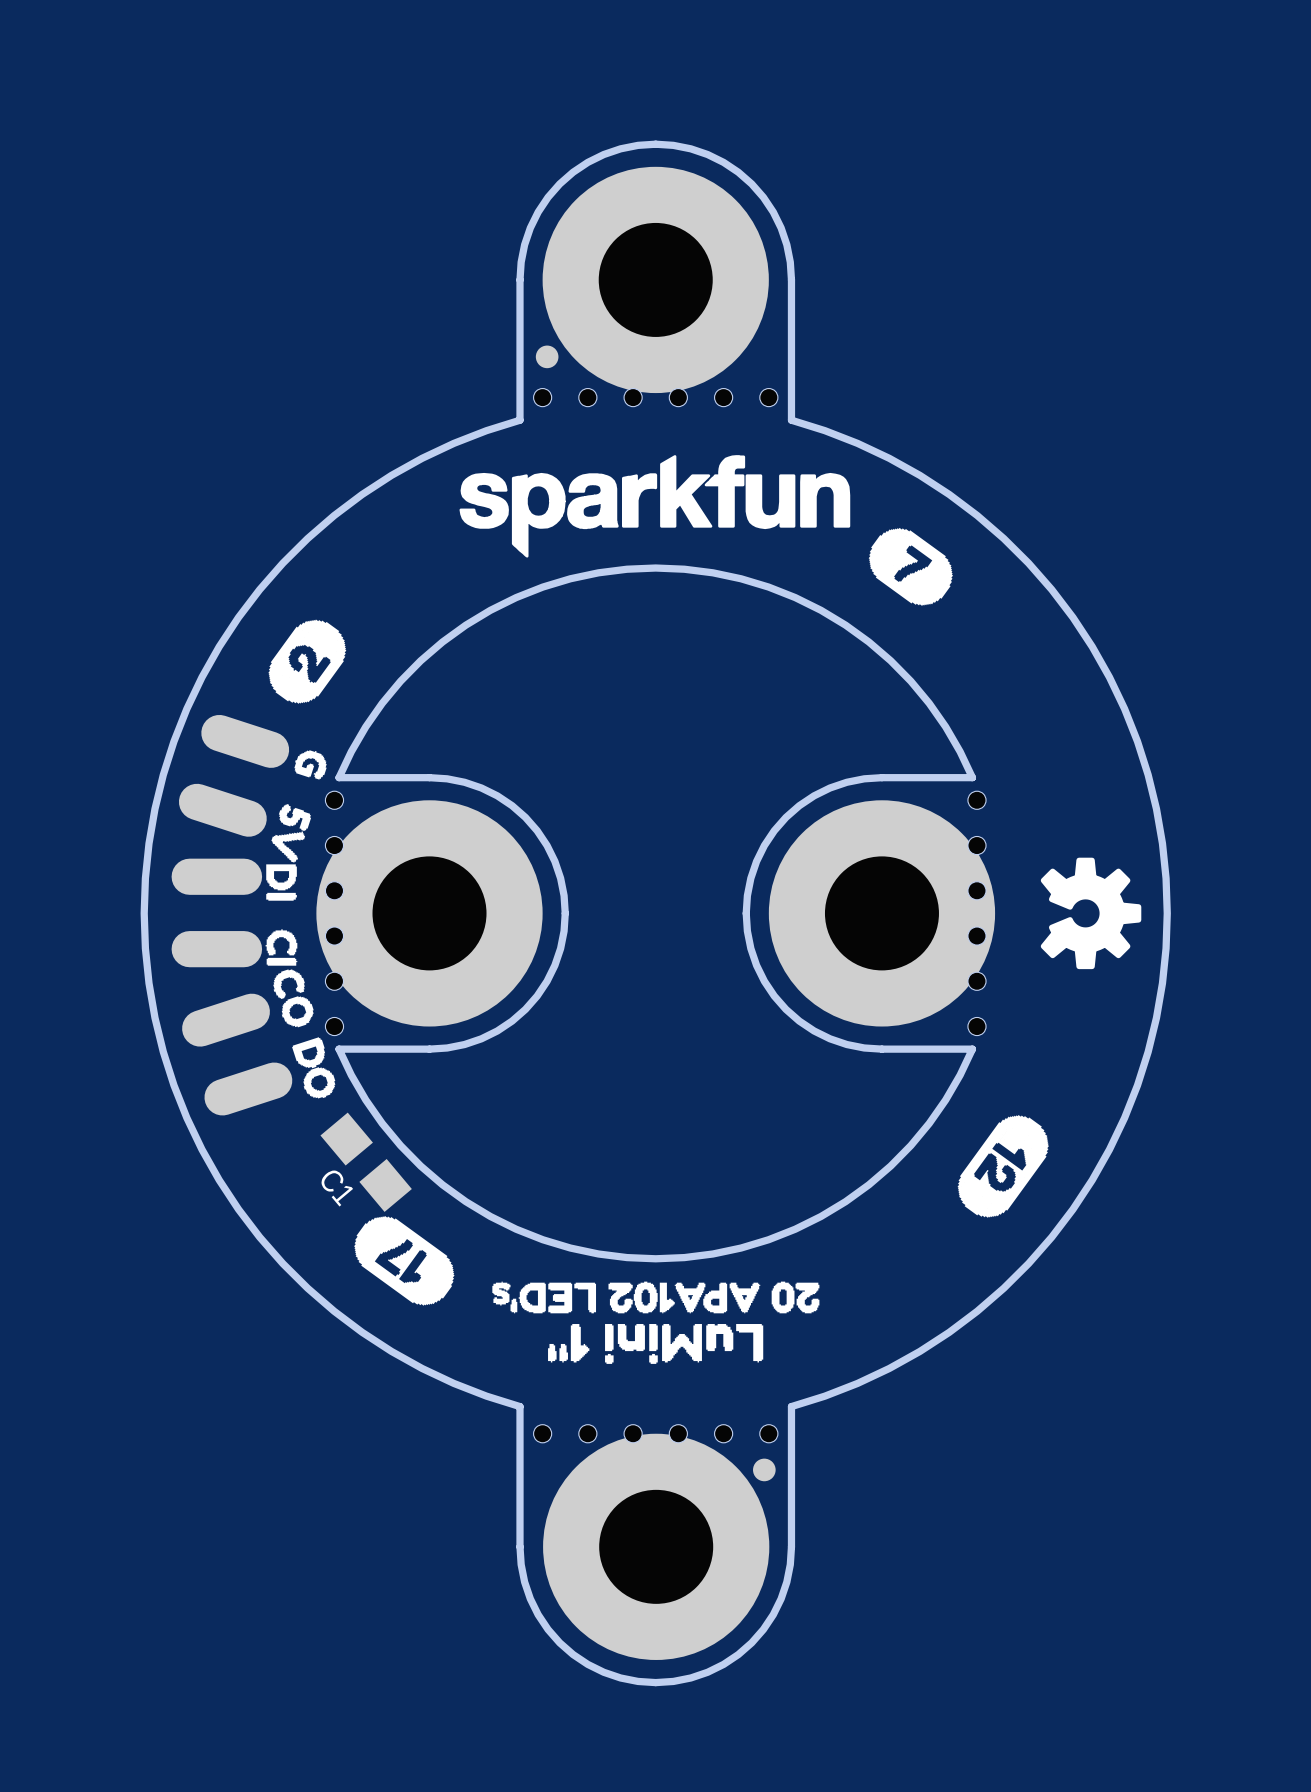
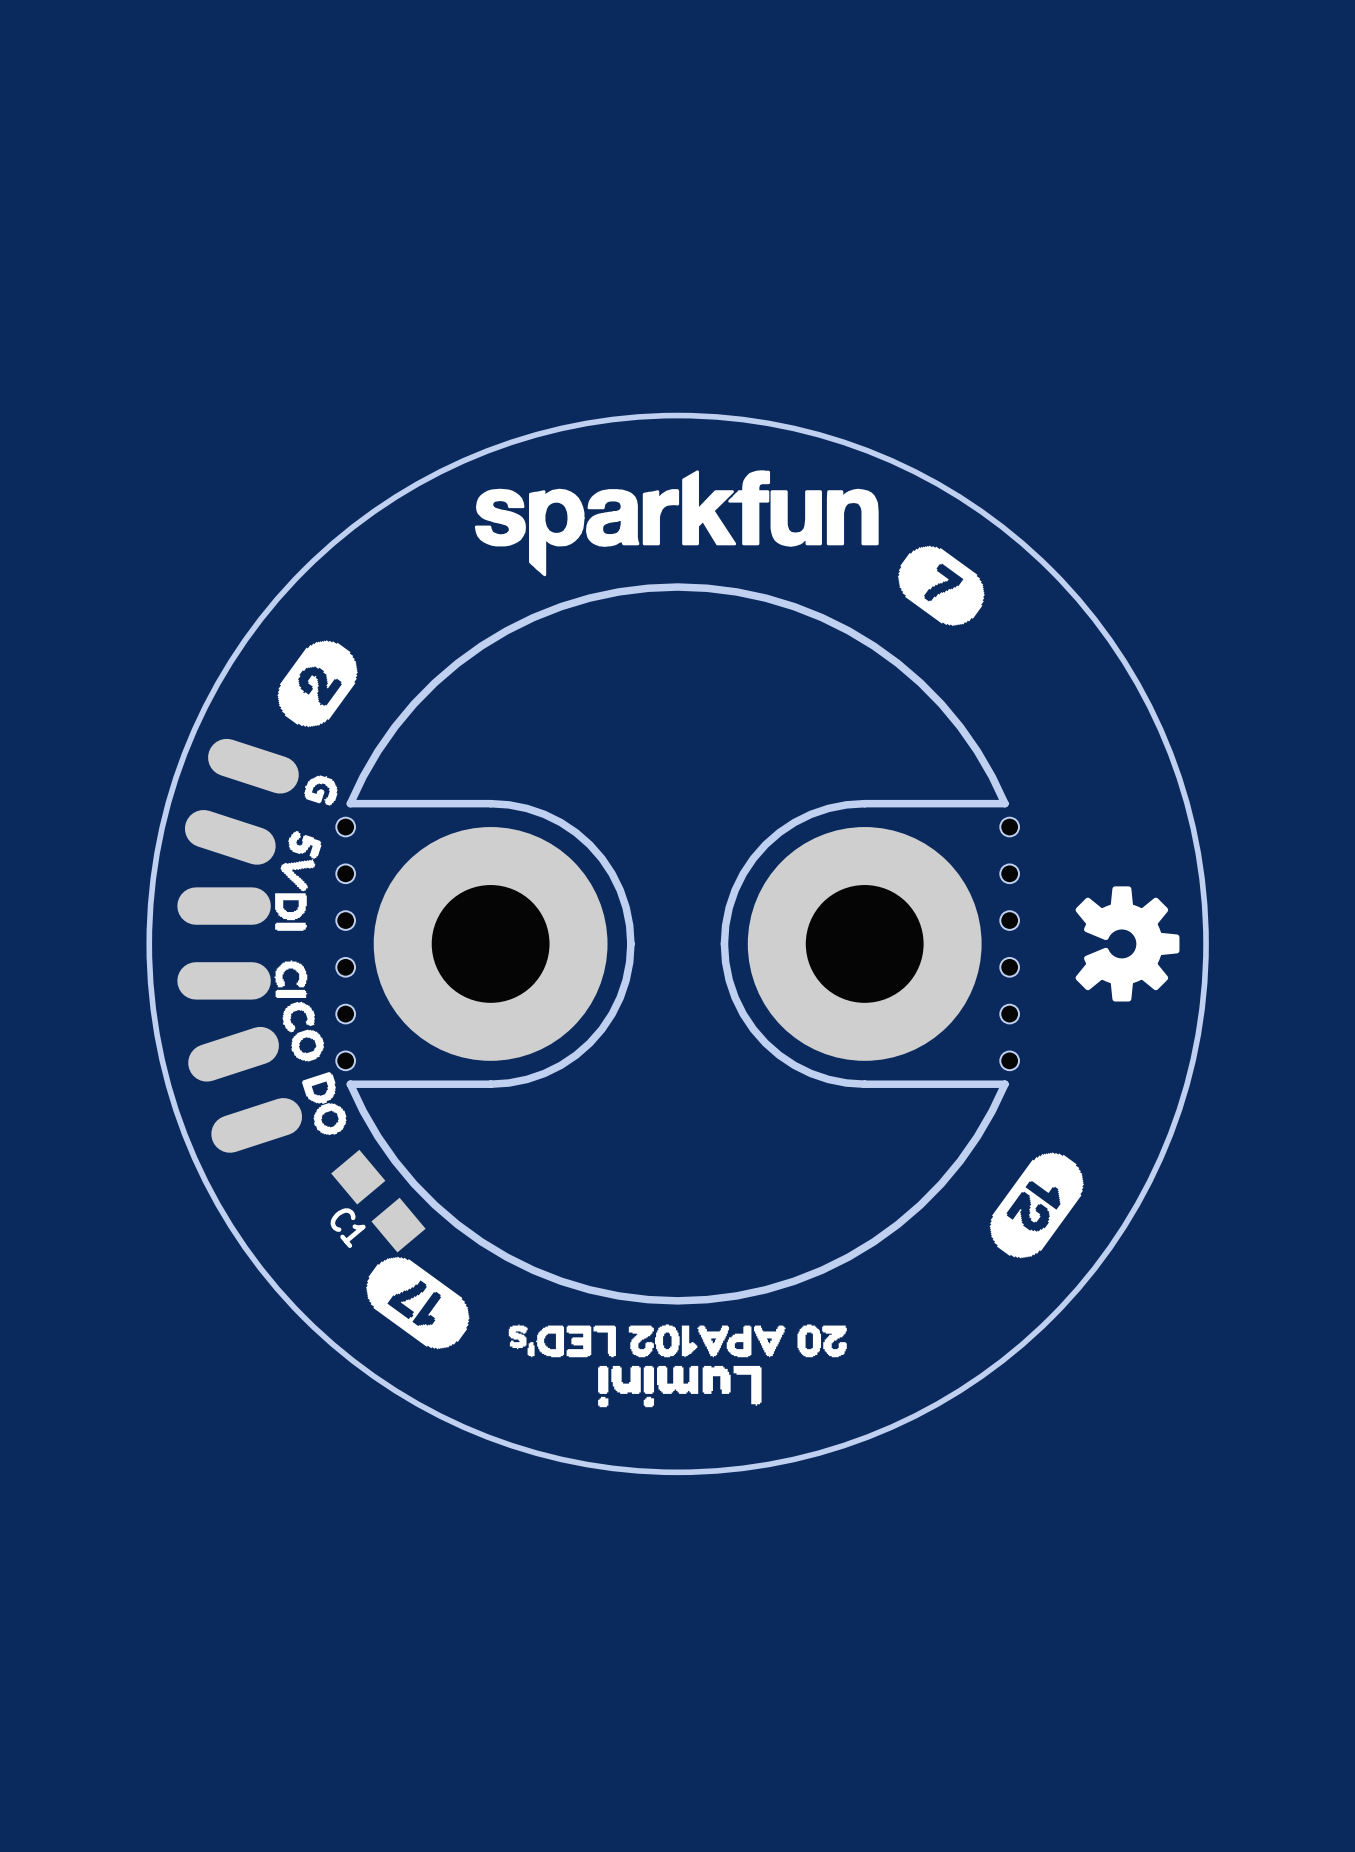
board edge: (655, 144) (620, 148) (587, 162) (559, 183) (548, 197) (530, 228) (524, 244) (519, 279) (519, 420) (453, 443) (391, 475) (362, 494) (307, 538) (259, 589) (238, 617) (219, 646) (186, 708) (163, 774) (149, 843) (144, 913) (149, 983) (163, 1051) (186, 1117) (219, 1180) (238, 1209) (259, 1237) (307, 1288) (362, 1332) (391, 1351) (453, 1383) (519, 1406) (519, 1546) (524, 1581) (530, 1598) (548, 1629) (559, 1642) (587, 1664) (620, 1677) (655, 1682) (690, 1677) (723, 1664) (751, 1642) (763, 1629) (781, 1598) (786, 1581) (791, 1546) (791, 1406) (857, 1383) (919, 1351) (949, 1332) (1003, 1288) (1051, 1237) (1072, 1209) (1092, 1180) (1124, 1117) (1148, 1051) (1162, 983) (1167, 913) (1162, 843) (1148, 774) (1124, 708) (1092, 646) (1072, 617) (1051, 589) (1003, 538) (949, 494) (919, 475) (857, 443) (791, 420) (791, 279) (786, 244) (781, 228) (763, 197) (751, 183) (723, 162) (690, 148) (655, 144) -> none
part: (655, 279) -> none
part: (547, 356) -> none
hole: (542, 397) -> none
hole: (587, 397) -> none
hole: (633, 397) -> none
hole: (678, 397) -> none
hole: (723, 397) -> none
hole: (768, 397) -> none
round board edge: none -> [146, 412, 1209, 1476]
board edge: (429, 777) (464, 782) (481, 787) (497, 795) (525, 817) (547, 845) (554, 861) (560, 878) (565, 913) (560, 948) (554, 965) (547, 981) (525, 1009) (497, 1030) (481, 1038) (464, 1044) (429, 1049) -> (443, 803) (490, 803) (526, 808) (560, 822) (576, 832) (589, 844) (612, 873) (626, 907) (630, 943) (626, 980) (612, 1014) (589, 1043) (576, 1055) (560, 1065) (526, 1079) (490, 1084) (443, 1084)
board edge: (881, 777) (846, 782) (830, 787) (814, 795) (785, 817) (764, 845) (756, 861) (750, 878) (746, 913) (750, 948) (756, 965) (764, 981) (785, 1009) (814, 1030) (830, 1038) (846, 1044) (881, 1049) -> (911, 803) (864, 803) (828, 808) (794, 822) (779, 832) (765, 844) (743, 873) (729, 907) (724, 943) (729, 980) (743, 1014) (765, 1043) (779, 1055) (794, 1065) (828, 1079) (864, 1084) (911, 1084)
part position: (429, 913) -> (490, 943)
part position: (881, 913) -> (864, 943)
drawing shape: [548, 1324, 764, 1364] -> [598, 1365, 762, 1408]
hole: (542, 1433) -> none
hole: (587, 1433) -> none
hole: (633, 1433) -> none
hole: (678, 1433) -> none
hole: (723, 1433) -> none
hole: (768, 1433) -> none
part: (764, 1469) -> none
part: (656, 1546) -> none

